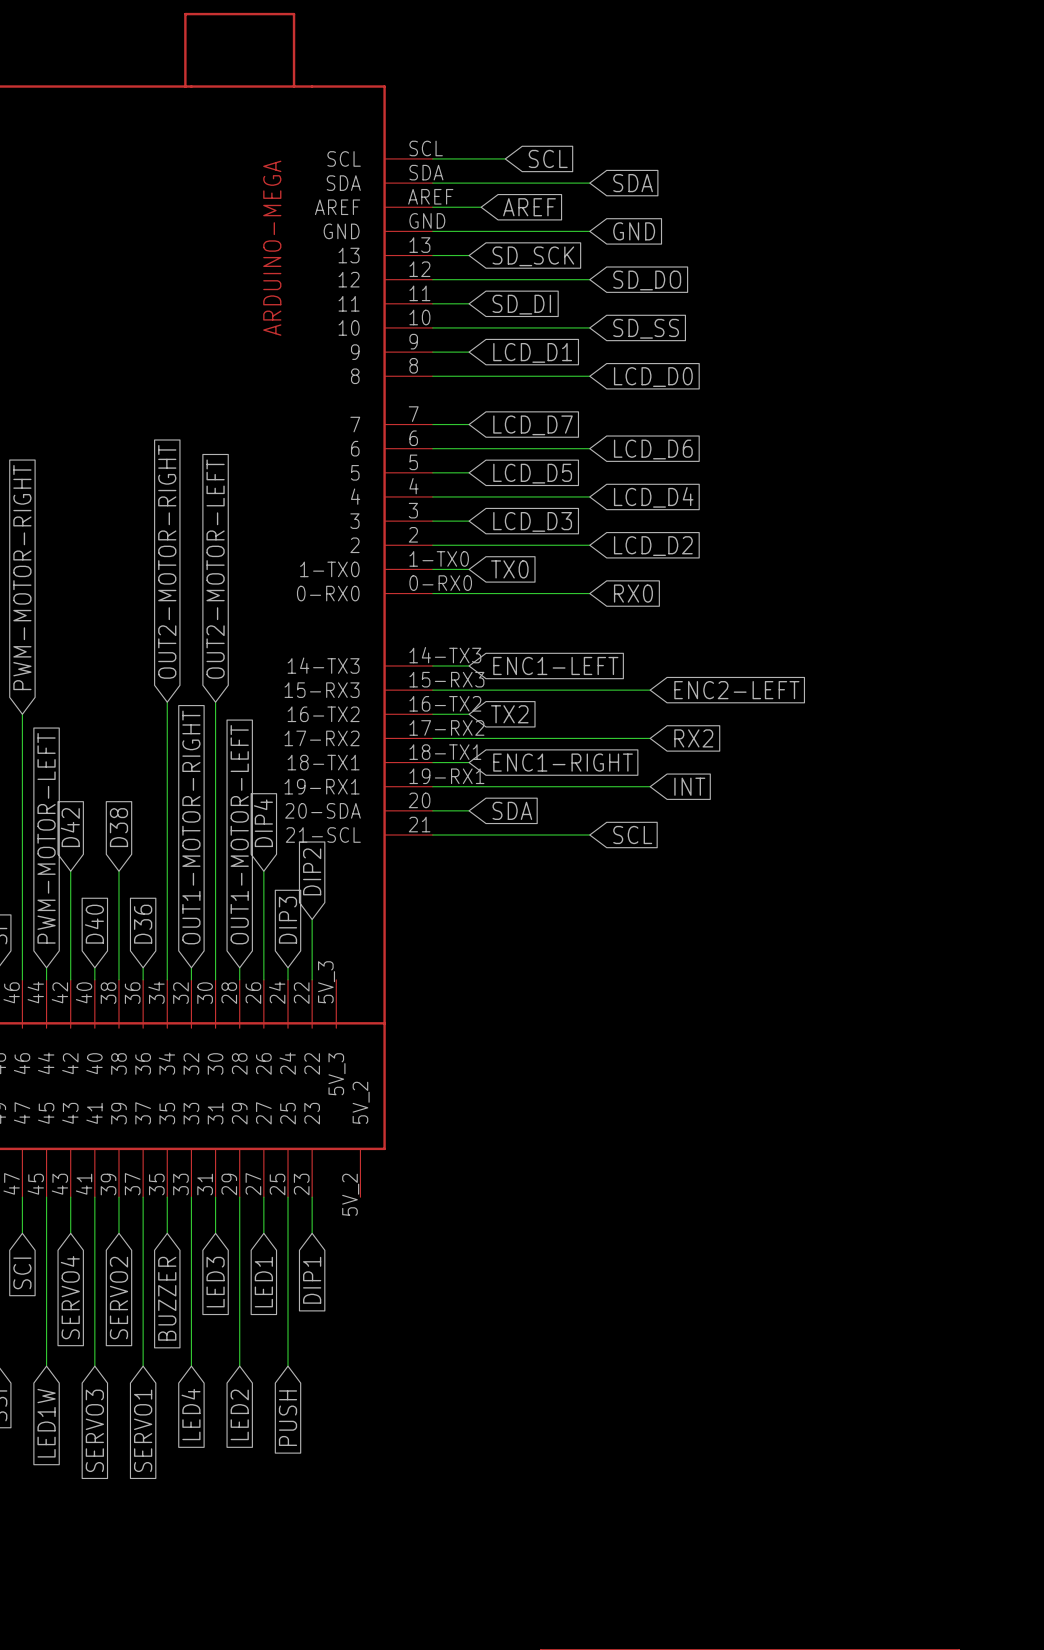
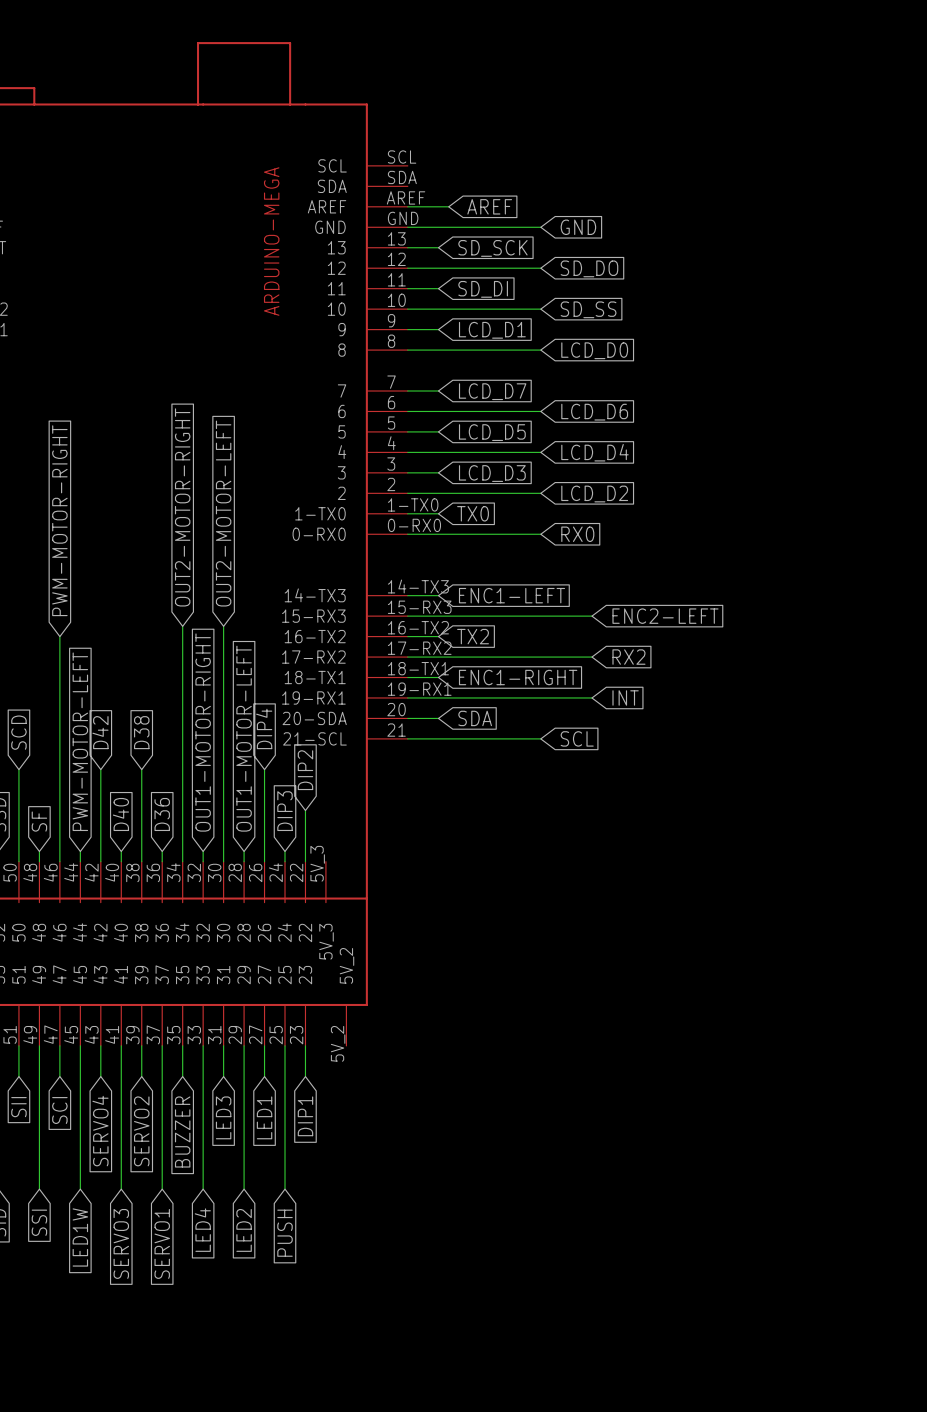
wire: (432, 158) (505, 158) -> none
global label: SCL (548, 158) -> none
wire: (432, 183) (589, 183) -> none
global label: SDA (633, 183) -> none

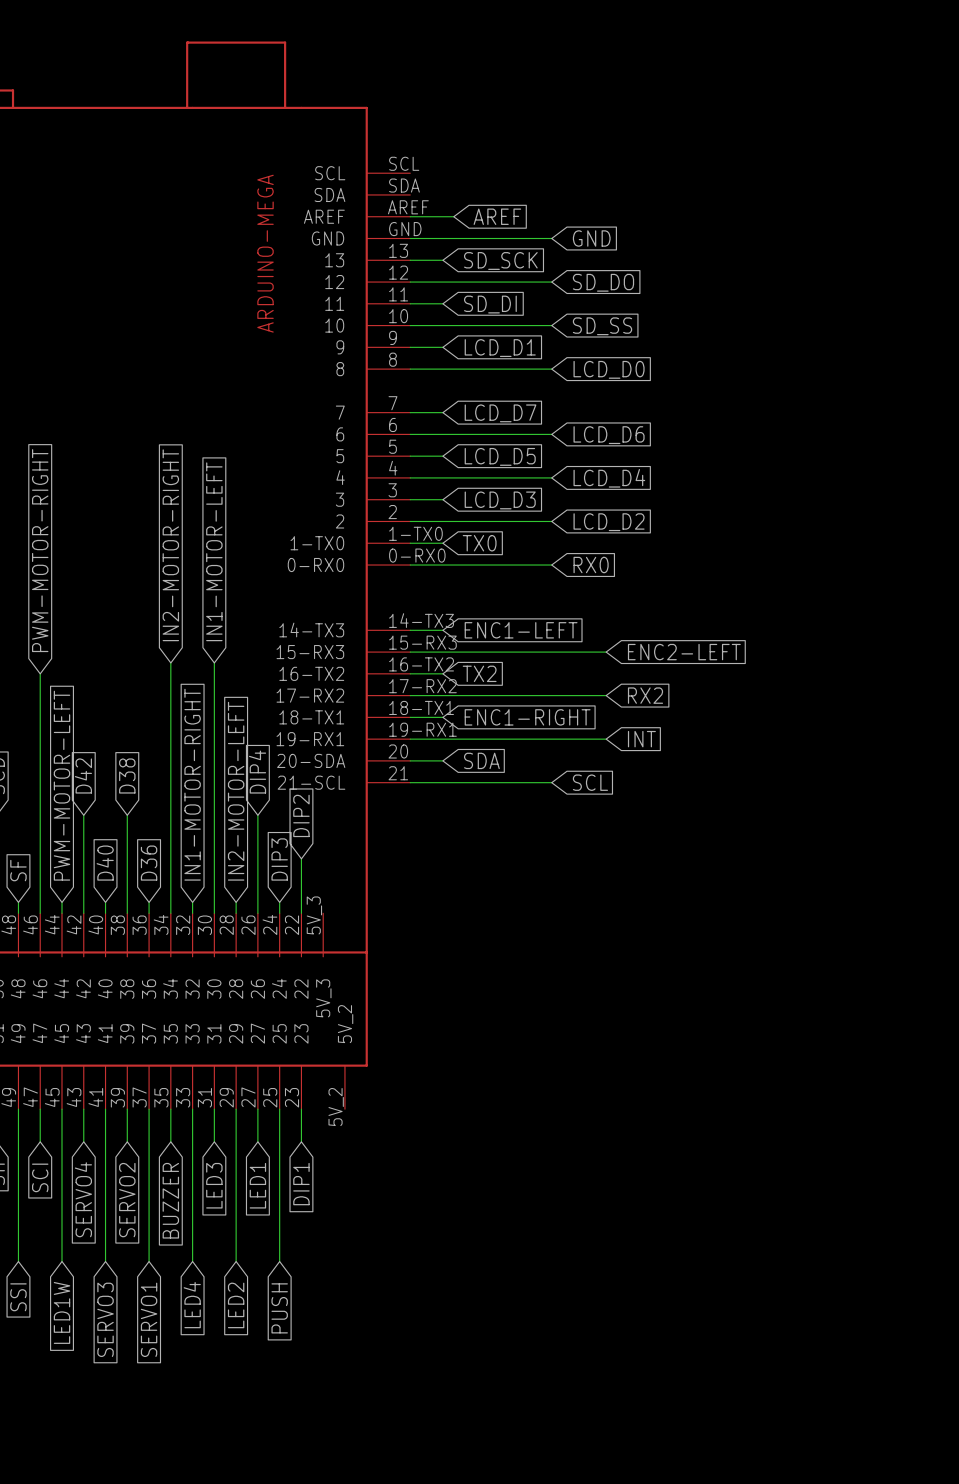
global label: OUT2-MOTOR-RIGHT (182, 507) -> IN2-MOTOR-RIGHT (170, 545)
global label: OUT2-MOTOR-LEFT (223, 513) -> IN1-MOTOR-LEFT (214, 551)
global label: OUT1-MOTOR-RIGHT (203, 732) -> IN1-MOTOR-RIGHT (192, 784)
global label: OUT1-MOTOR-LEFT (244, 738) -> IN2-MOTOR-LEFT (236, 791)

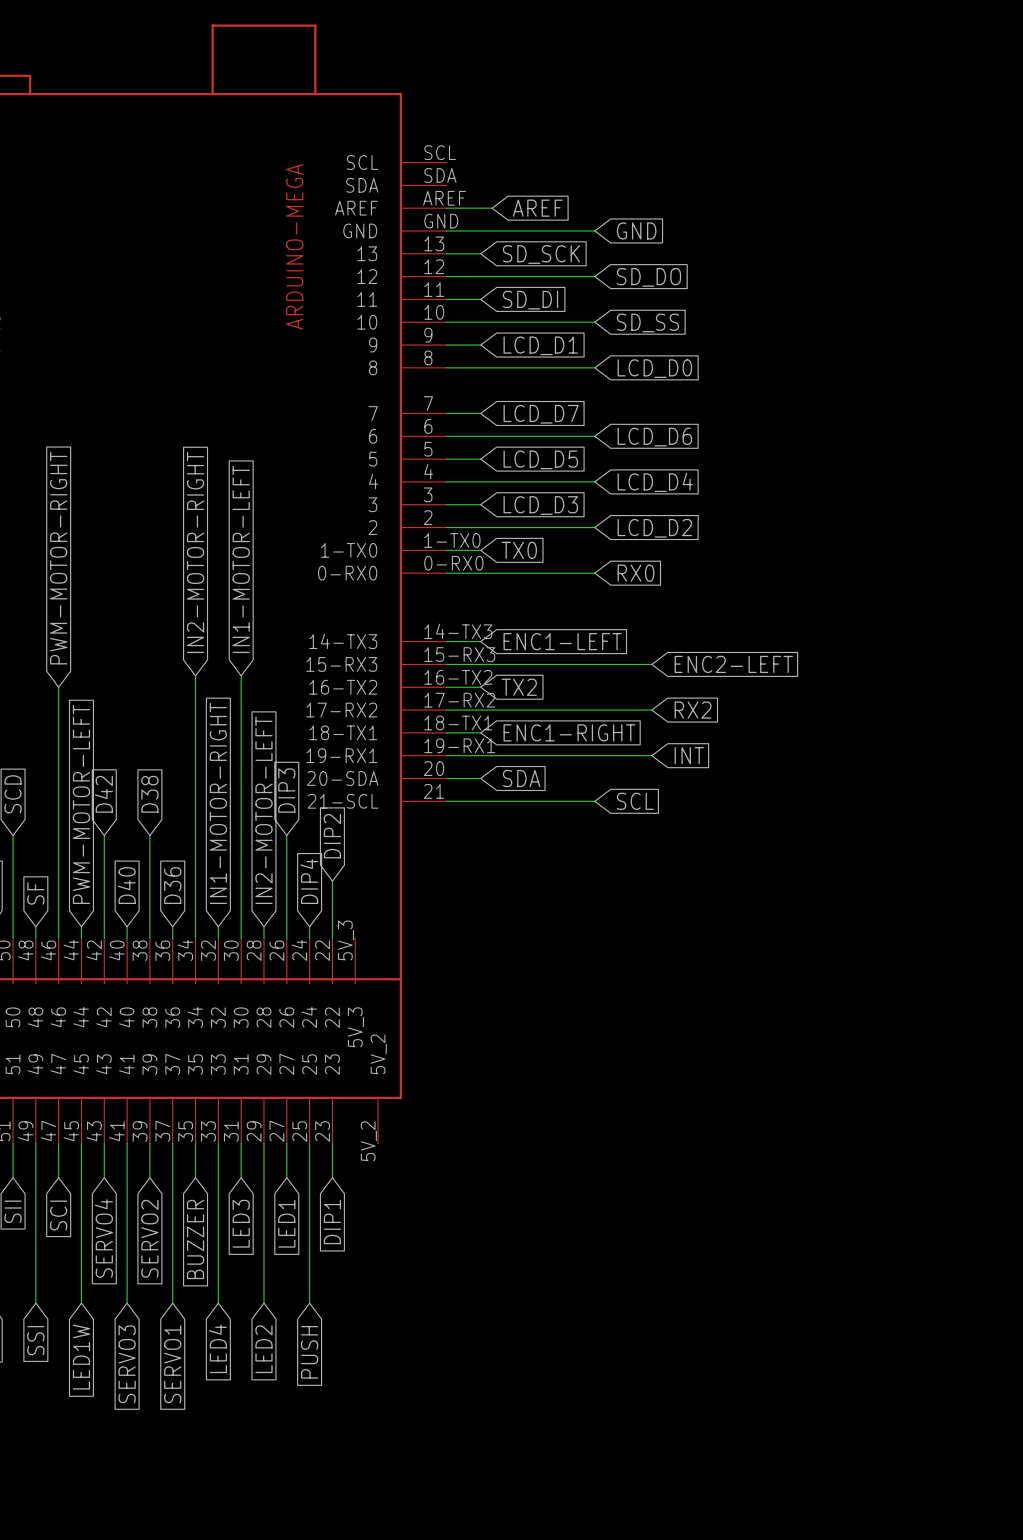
global label: DIP4 (257, 772) -> DIP3 (286, 790)
global label: DIP3 (279, 859) -> DIP4 (309, 881)

